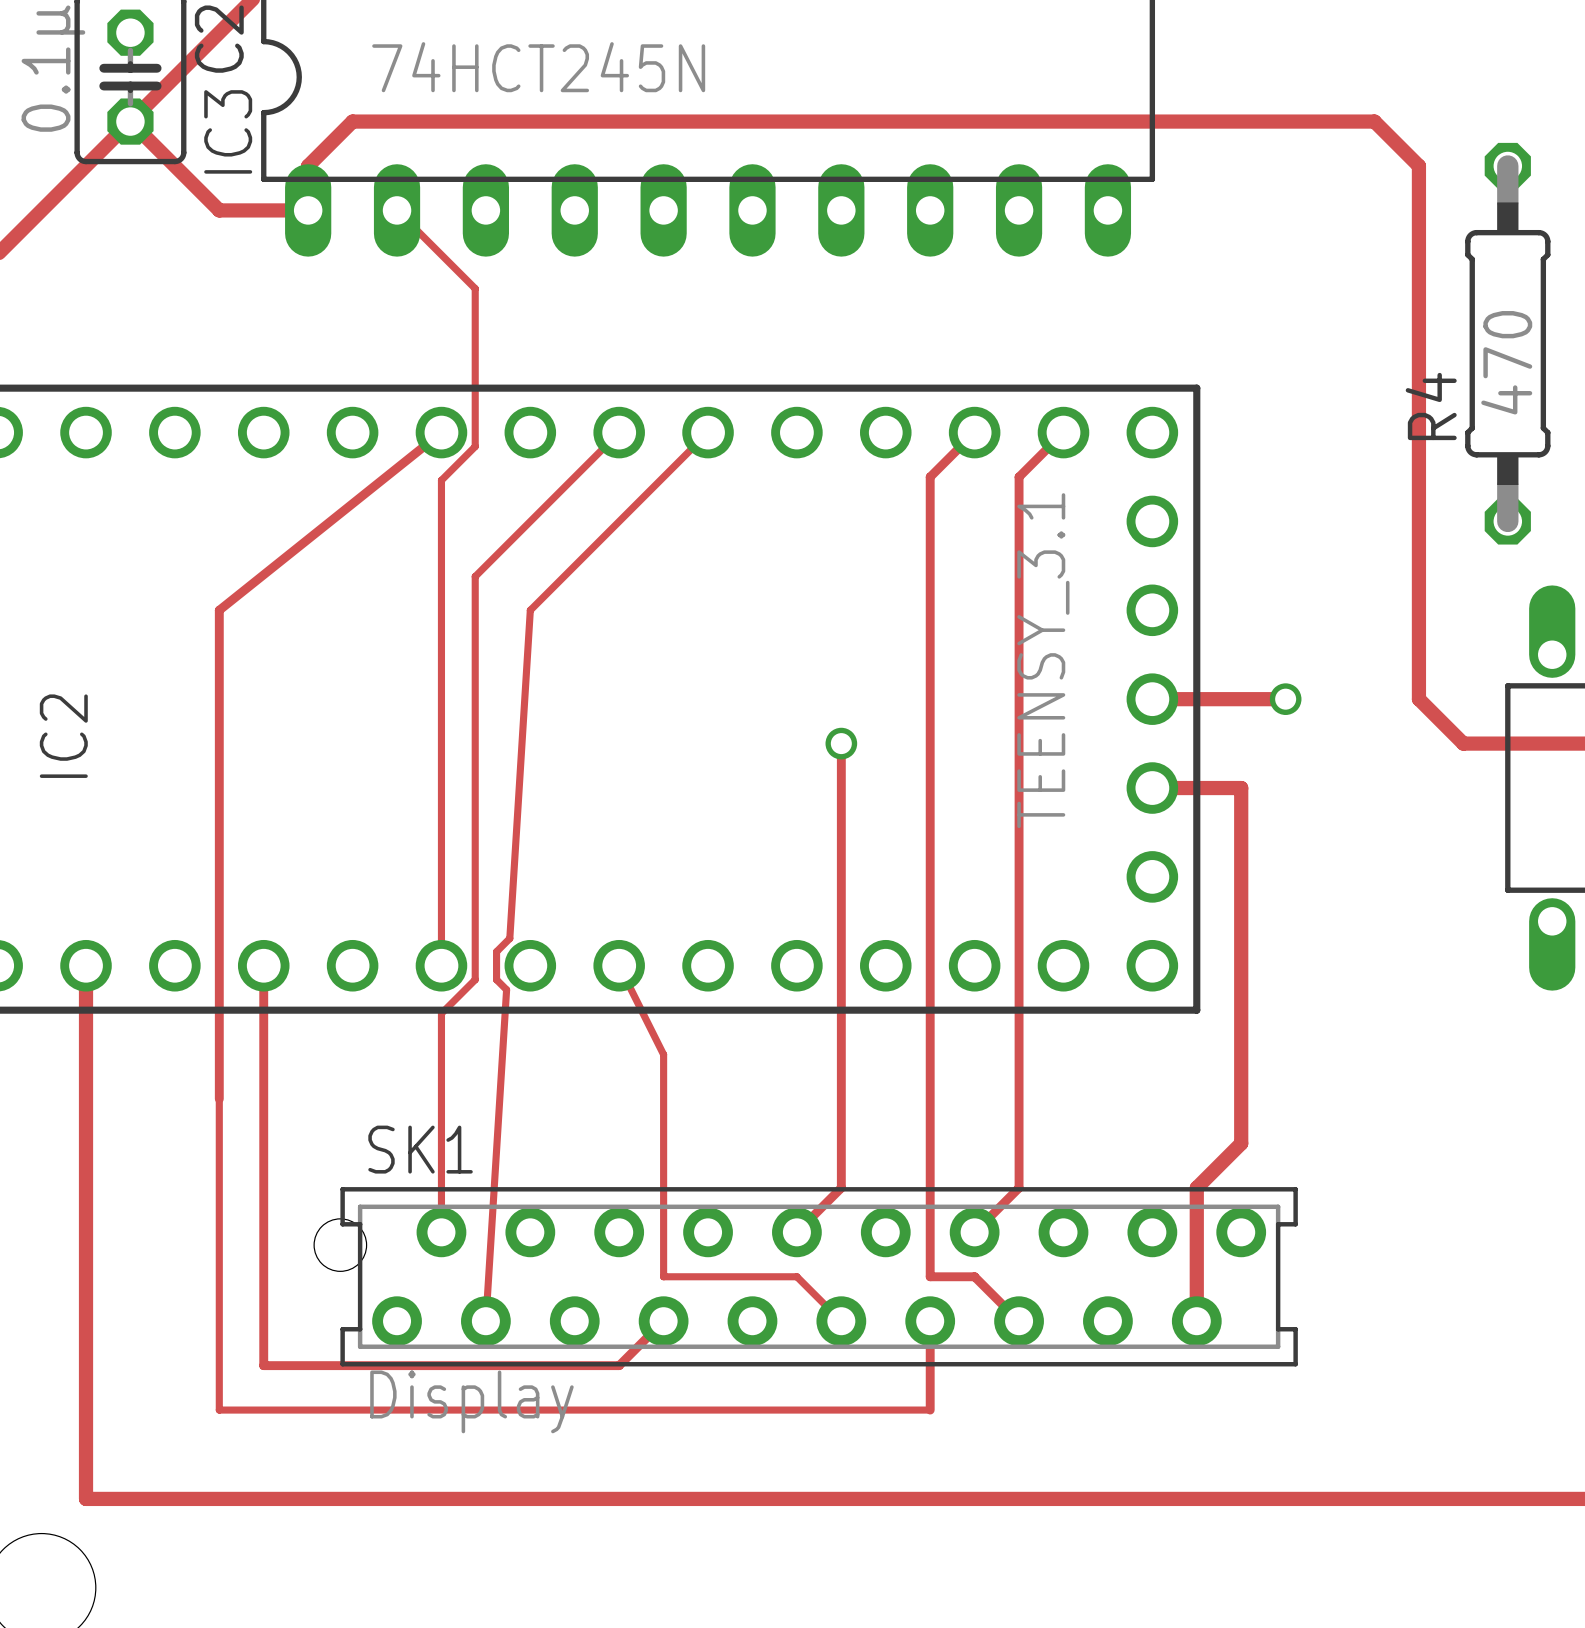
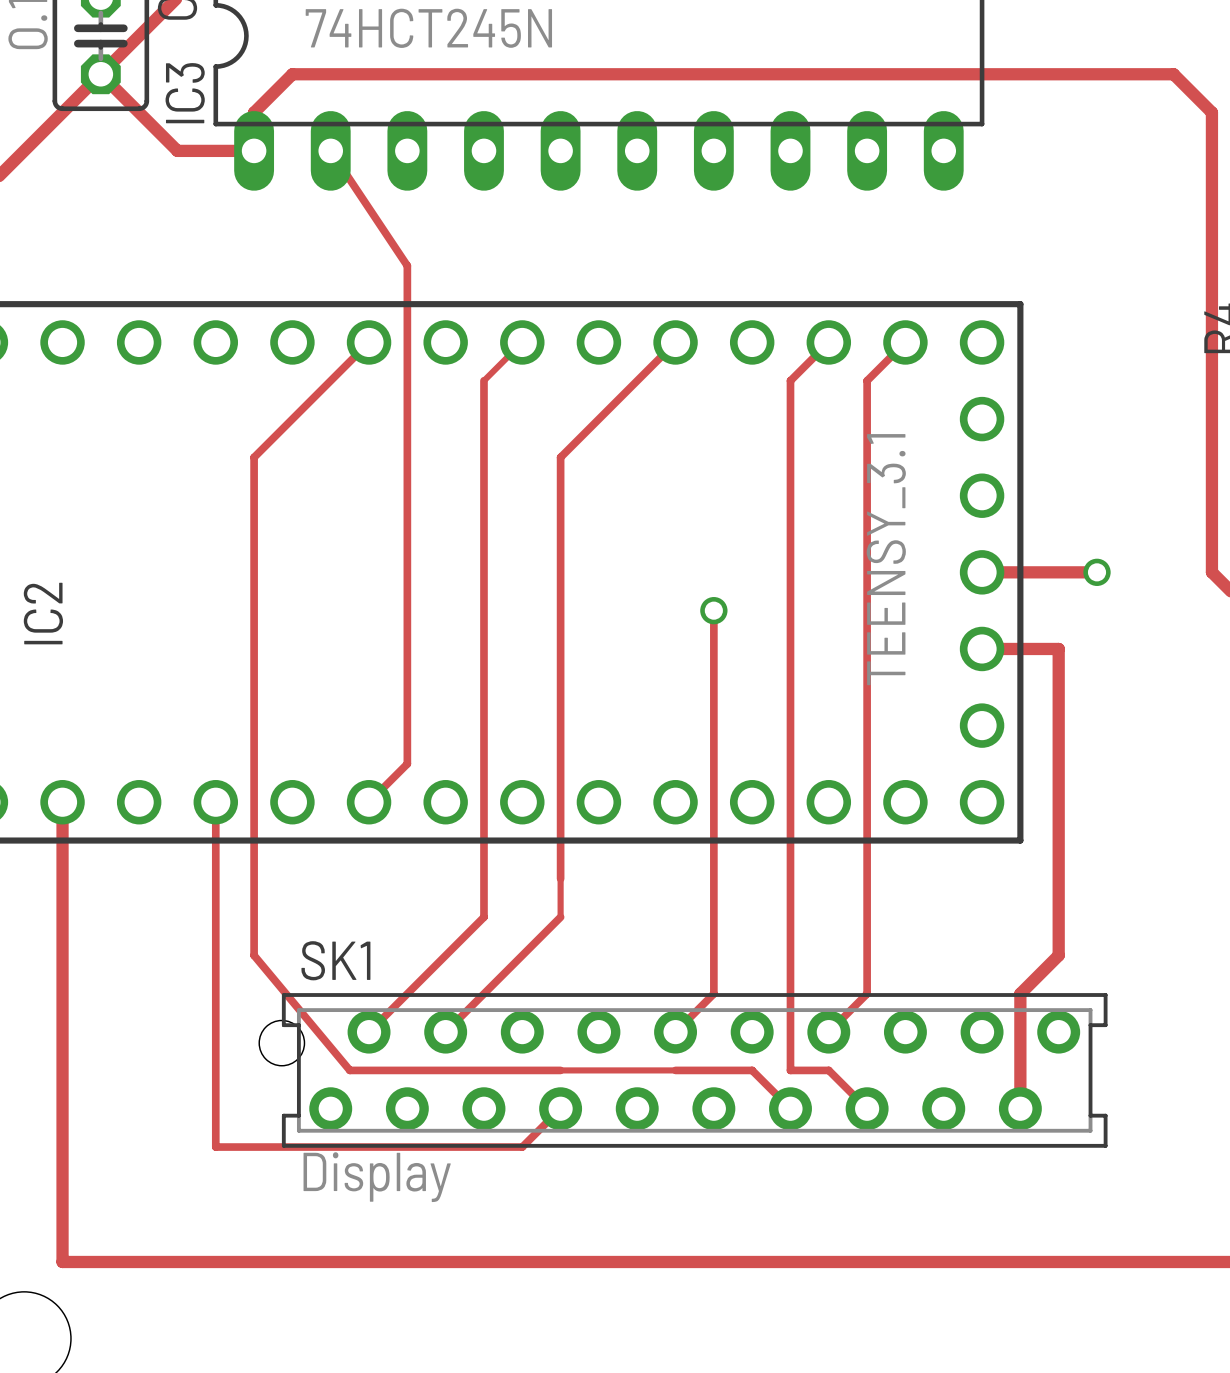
track: (397, 210) (475, 288) (475, 446) (441, 480) (441, 965) -> (330, 150) (407, 265) (407, 763) (369, 802)
track: (441, 432) (219, 610) (219, 1410) (930, 1410) (930, 1321) -> (369, 342) (254, 457) (254, 955) (349, 1070) (560, 1070)
track: (708, 432) (530, 610) (509, 938) (496, 951) (496, 979) (506, 989) (485, 1321) -> none
track: (574, 477) (475, 576) (475, 979) (441, 1013) (441, 1232) -> (483, 380) (483, 917) (369, 1032)
track: (619, 965) (663, 1054) -> (675, 342) (560, 457) (560, 878)
track: (663, 1099) (663, 1276) -> (560, 917) (445, 1032)
track: (796, 1276) (841, 1321) -> (675, 1070) (752, 1070) (790, 1108)

